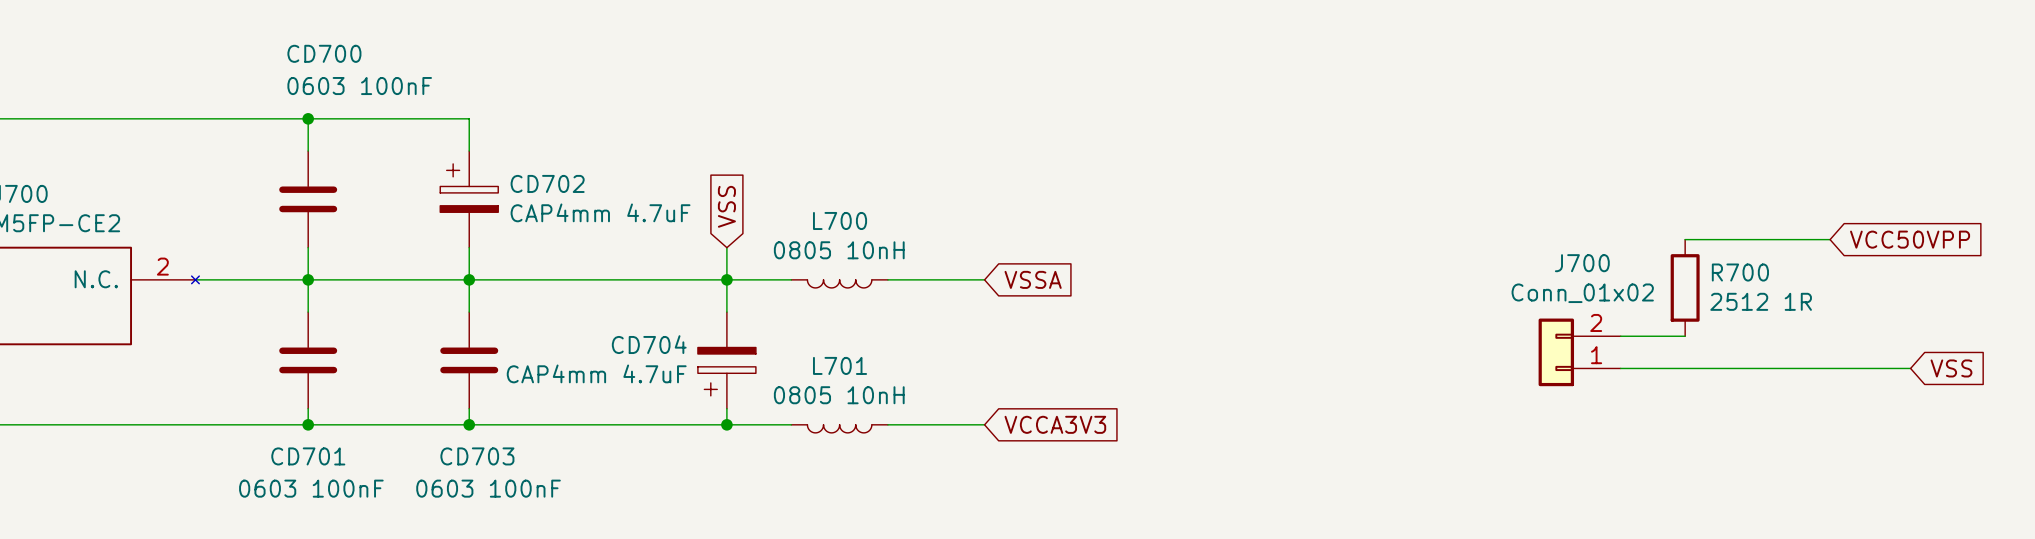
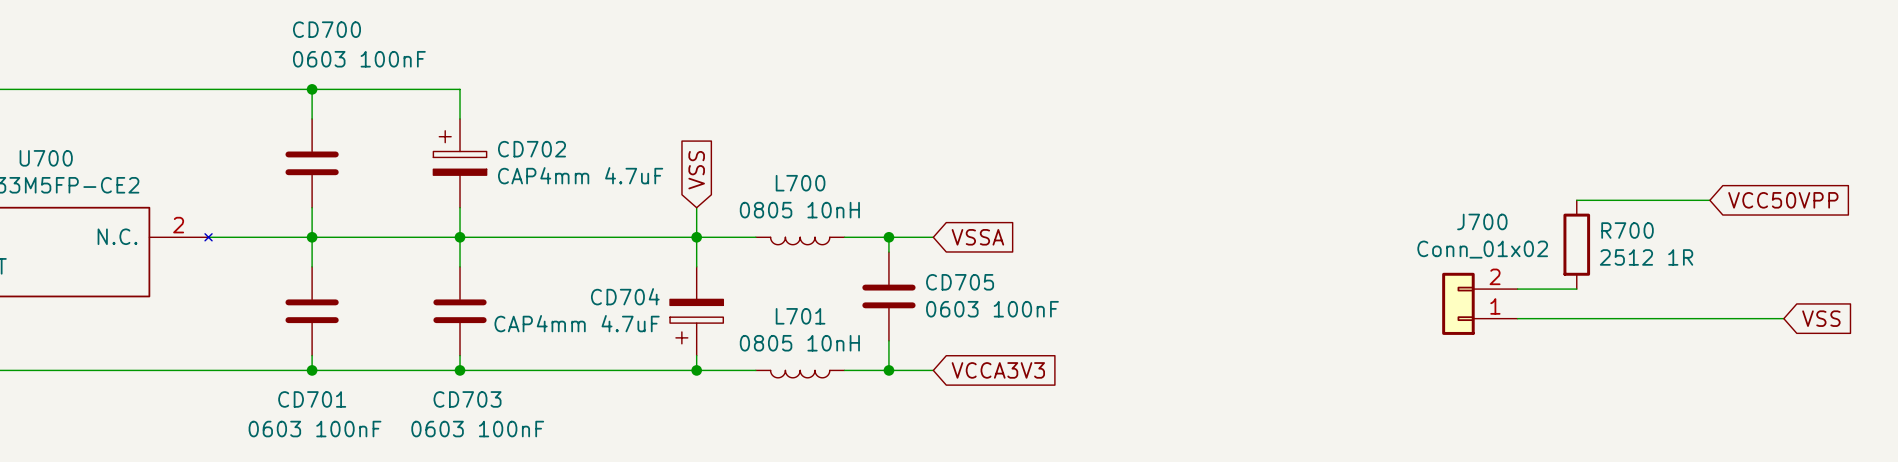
wire: none -> (888, 237) (888, 252)
junction: none -> (888, 237)
CD705: none -> 0603 100nF (888, 296)
wire: none -> (888, 340) (888, 370)
junction: none -> (888, 370)

